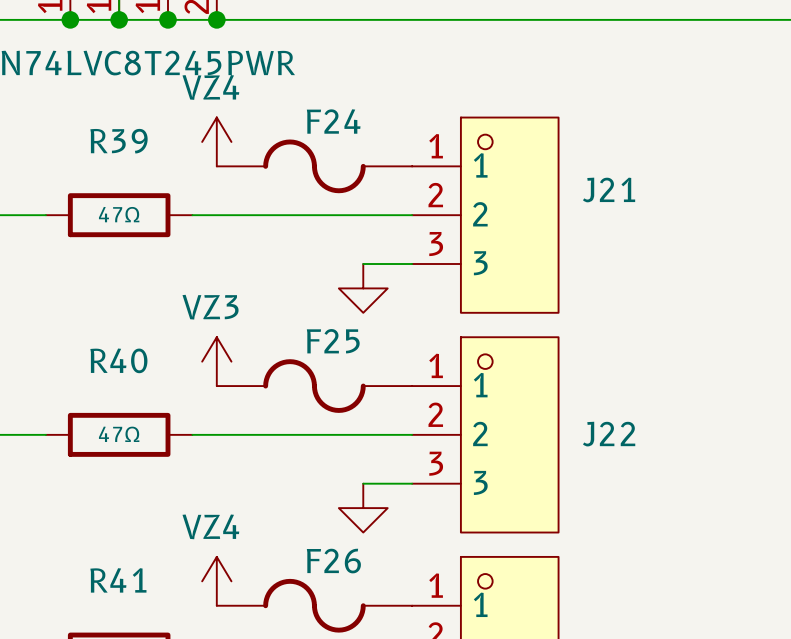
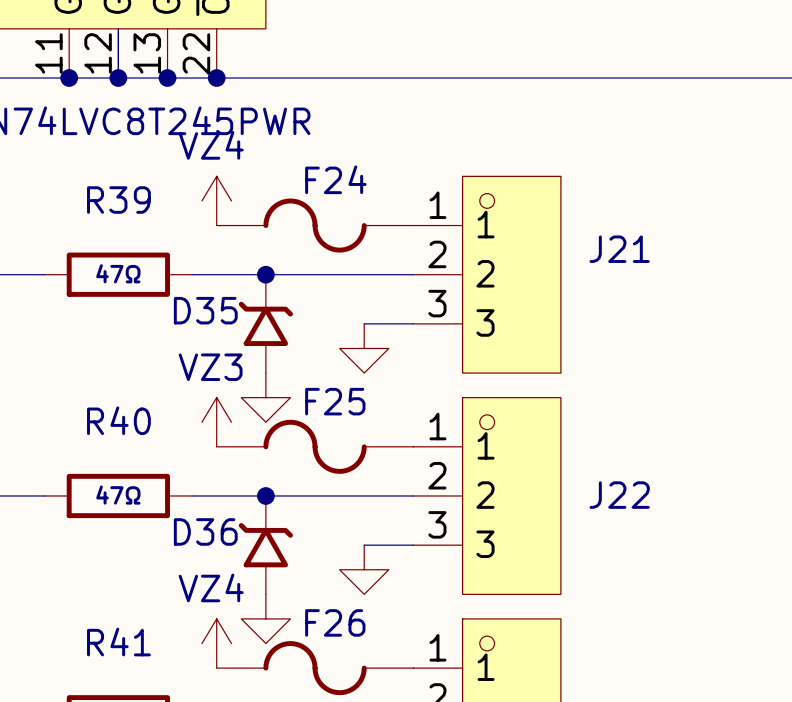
junction: none -> (265, 274)
D35: none -> (265, 323)
power symbol: none -> (265, 397)
junction: none -> (265, 495)
D36: none -> (265, 545)
power symbol: none -> (265, 618)

